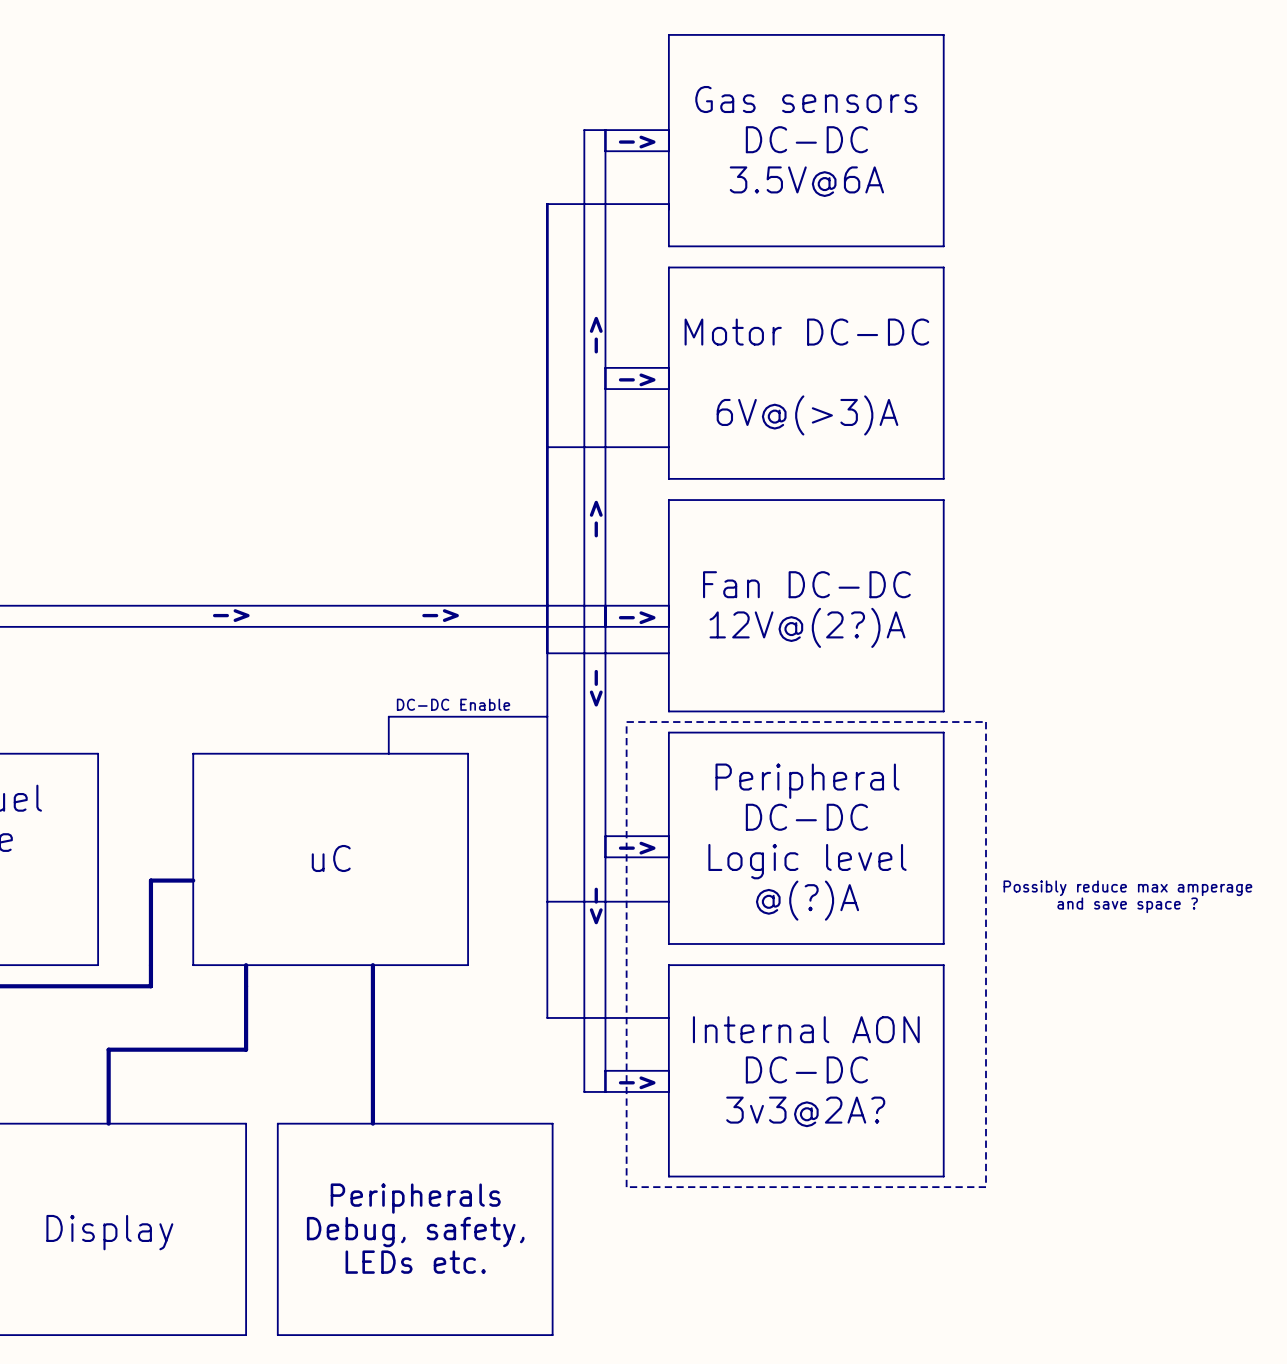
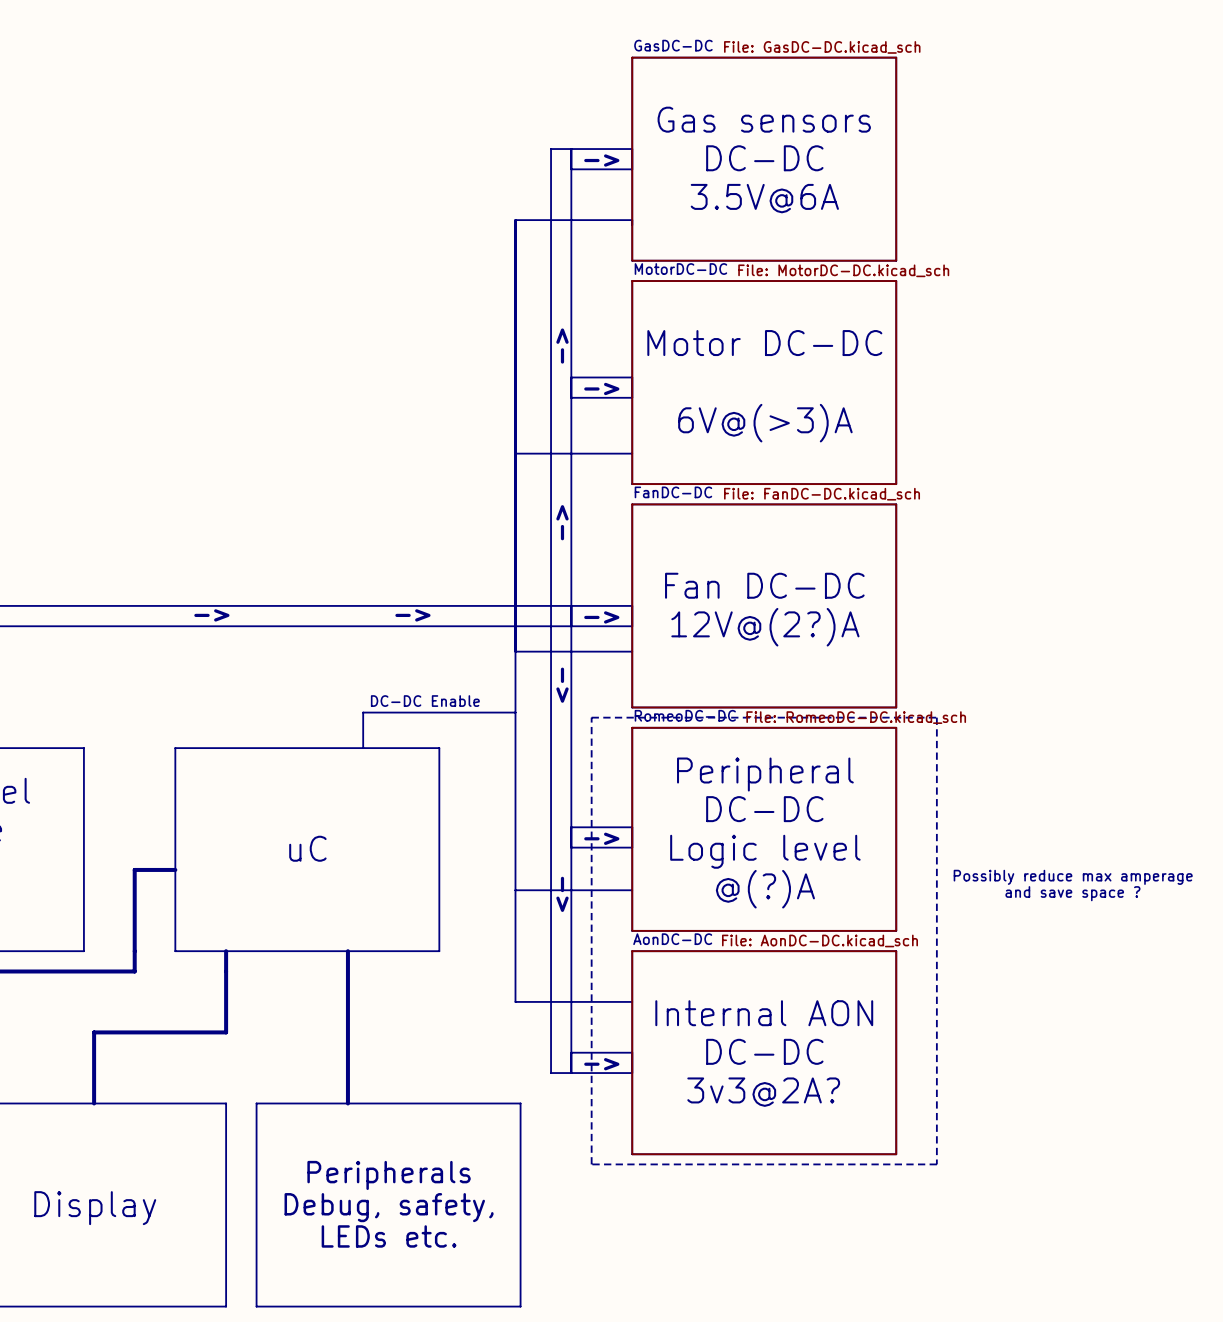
sheet GasDC-DC: none -> File: GasDC-DC.kicad_sch (764, 159)
sheet MotorDC-DC: none -> File: MotorDC-DC.kicad_sch (764, 382)
sheet FanDC-DC: none -> File: FanDC-DC.kicad_sch (764, 605)
sheet RomeoDC-DC: none -> File: RomeoDC-DC.kicad_sch (764, 829)
sheet AonDC-DC: none -> File: AonDC-DC.kicad_sch (764, 1052)

